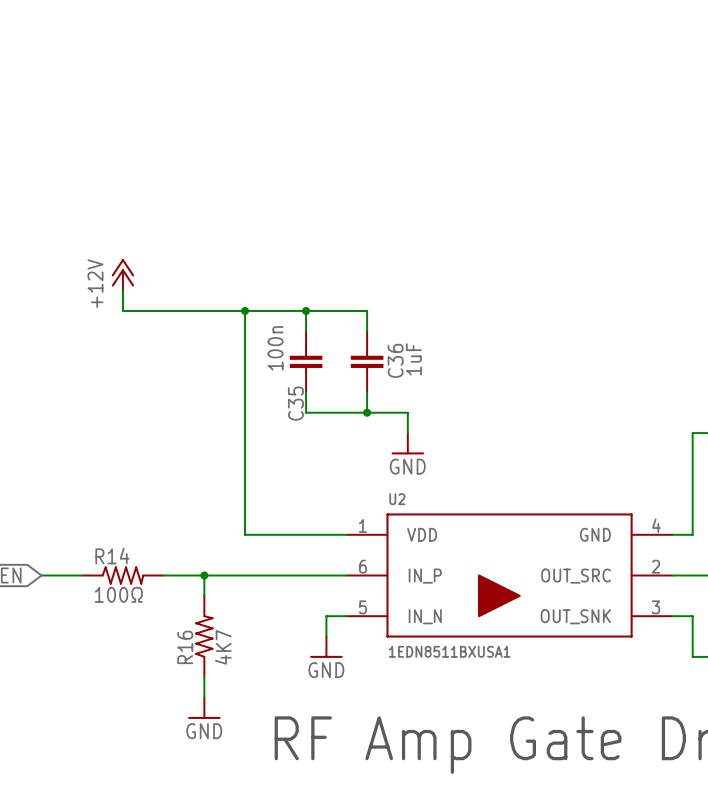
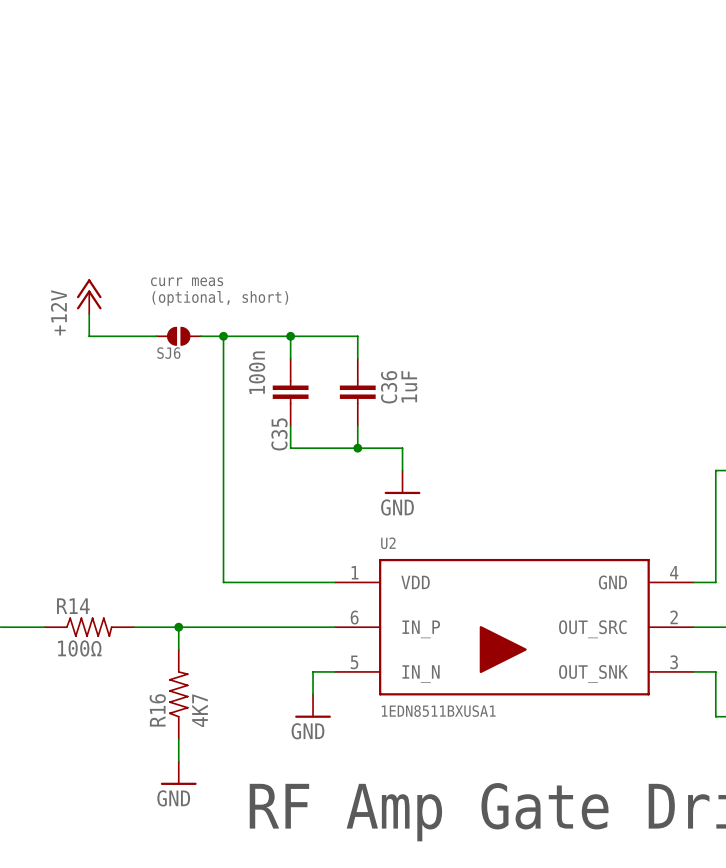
text: none -> curr meas (187, 281)
text: none -> (optional, short) (220, 298)
SJ6: none -> (178, 336)

